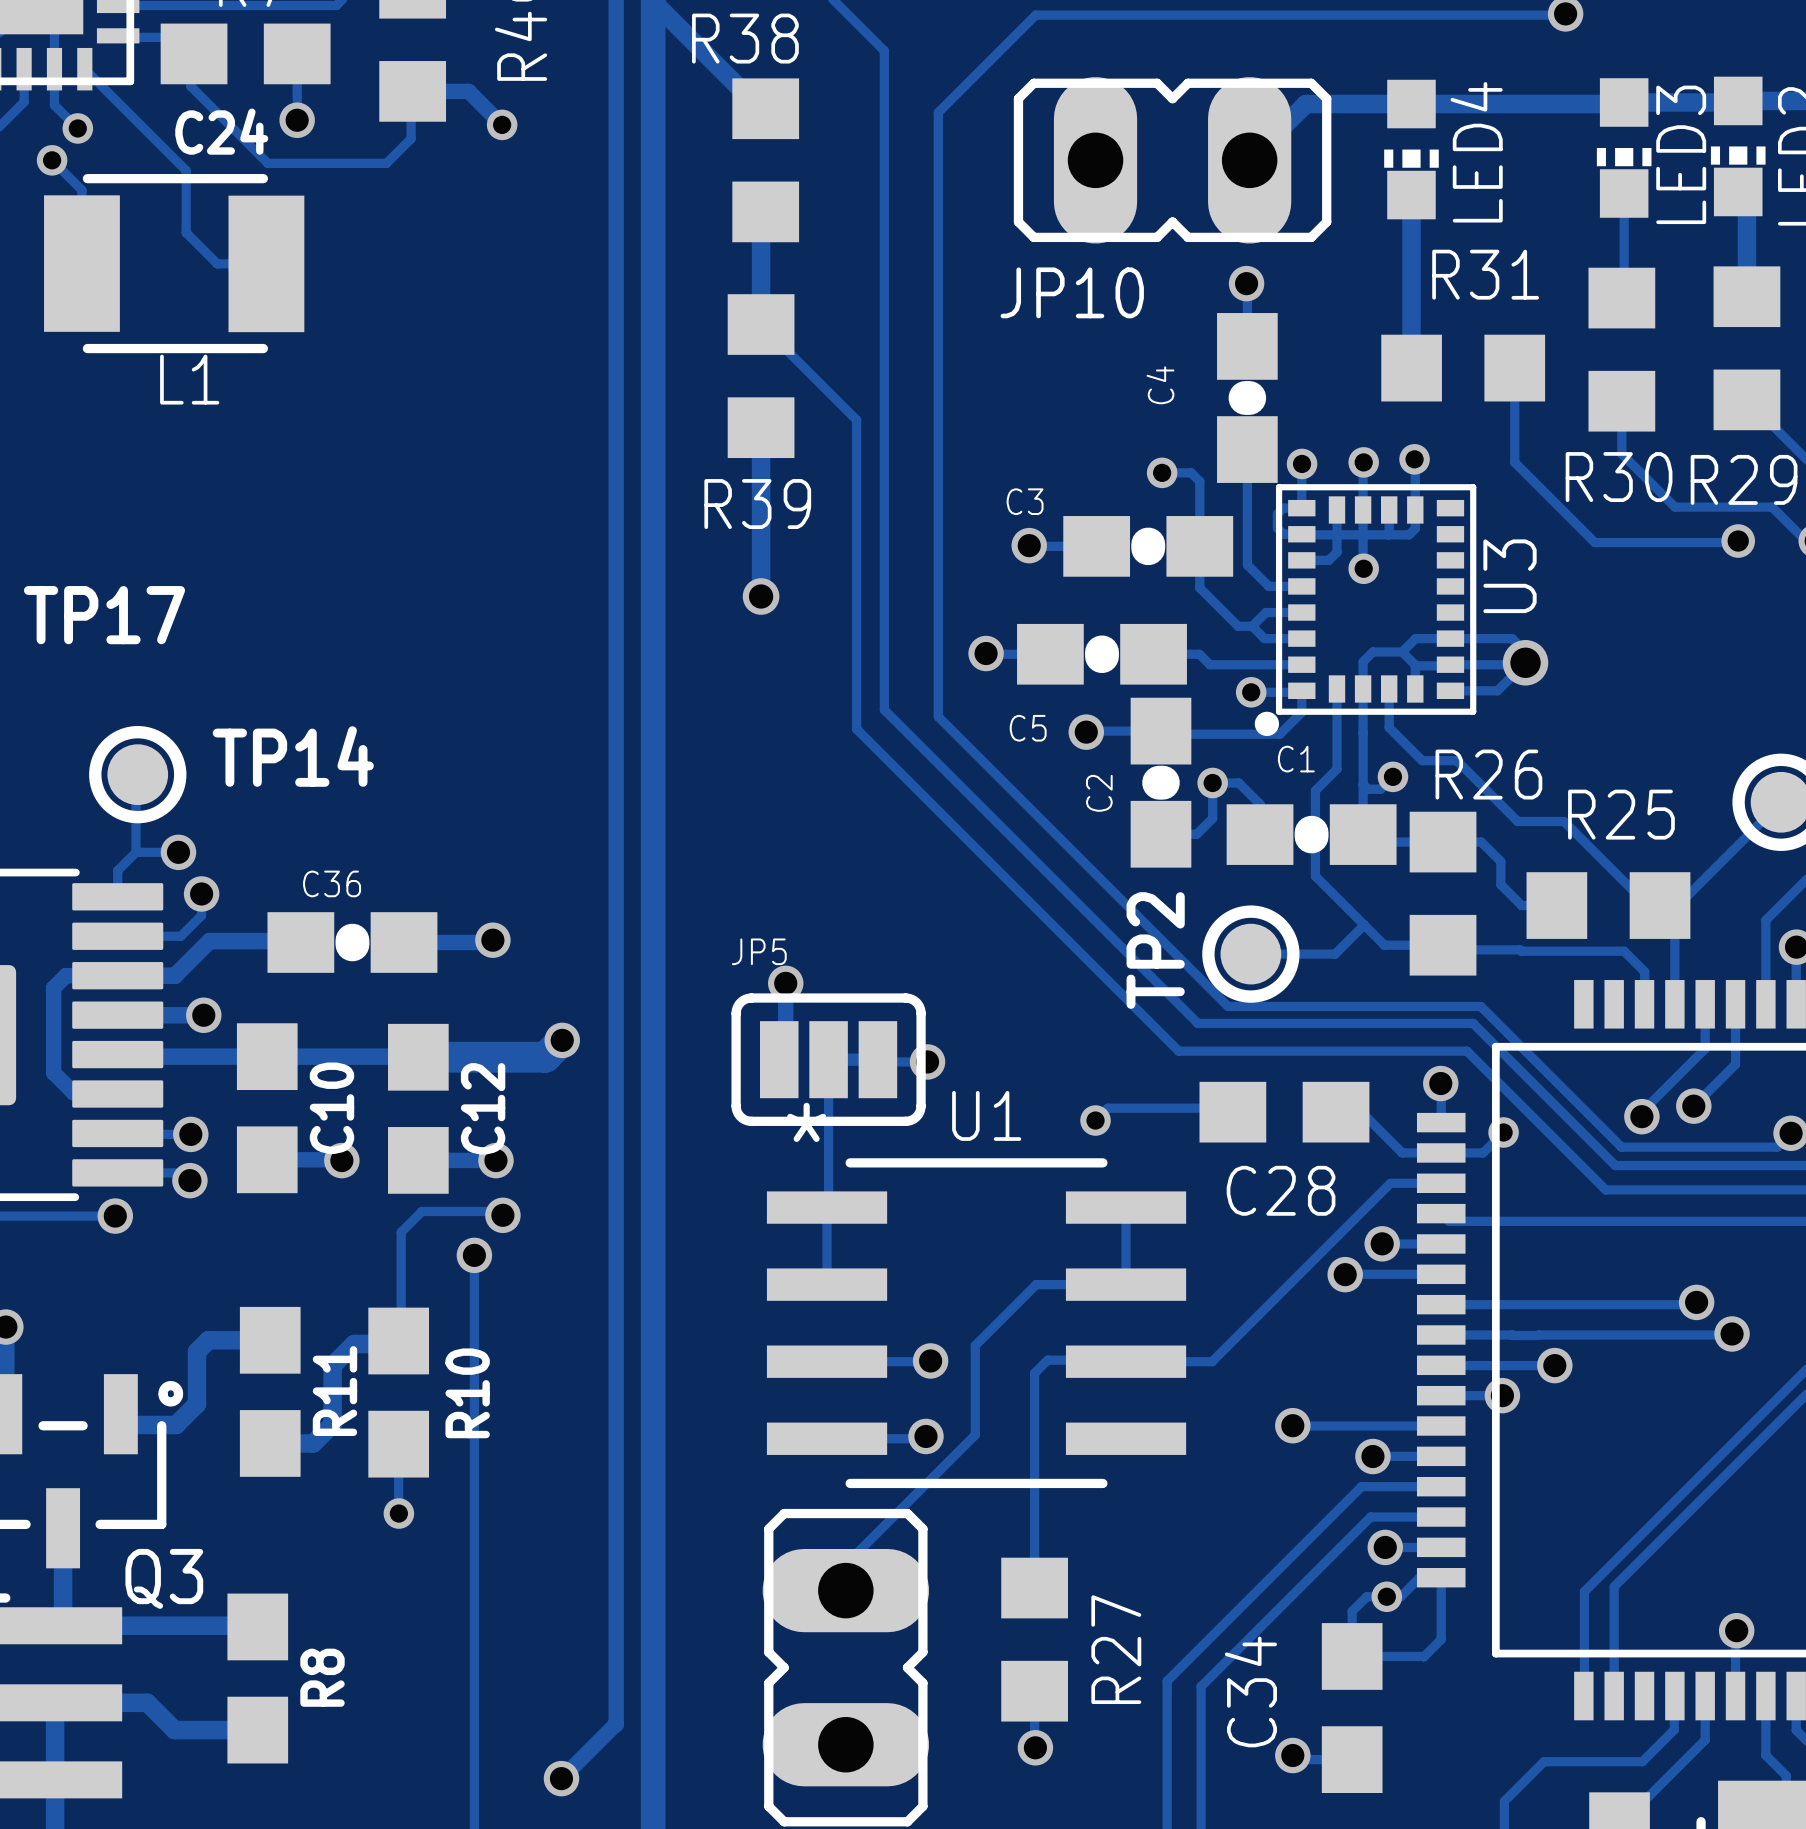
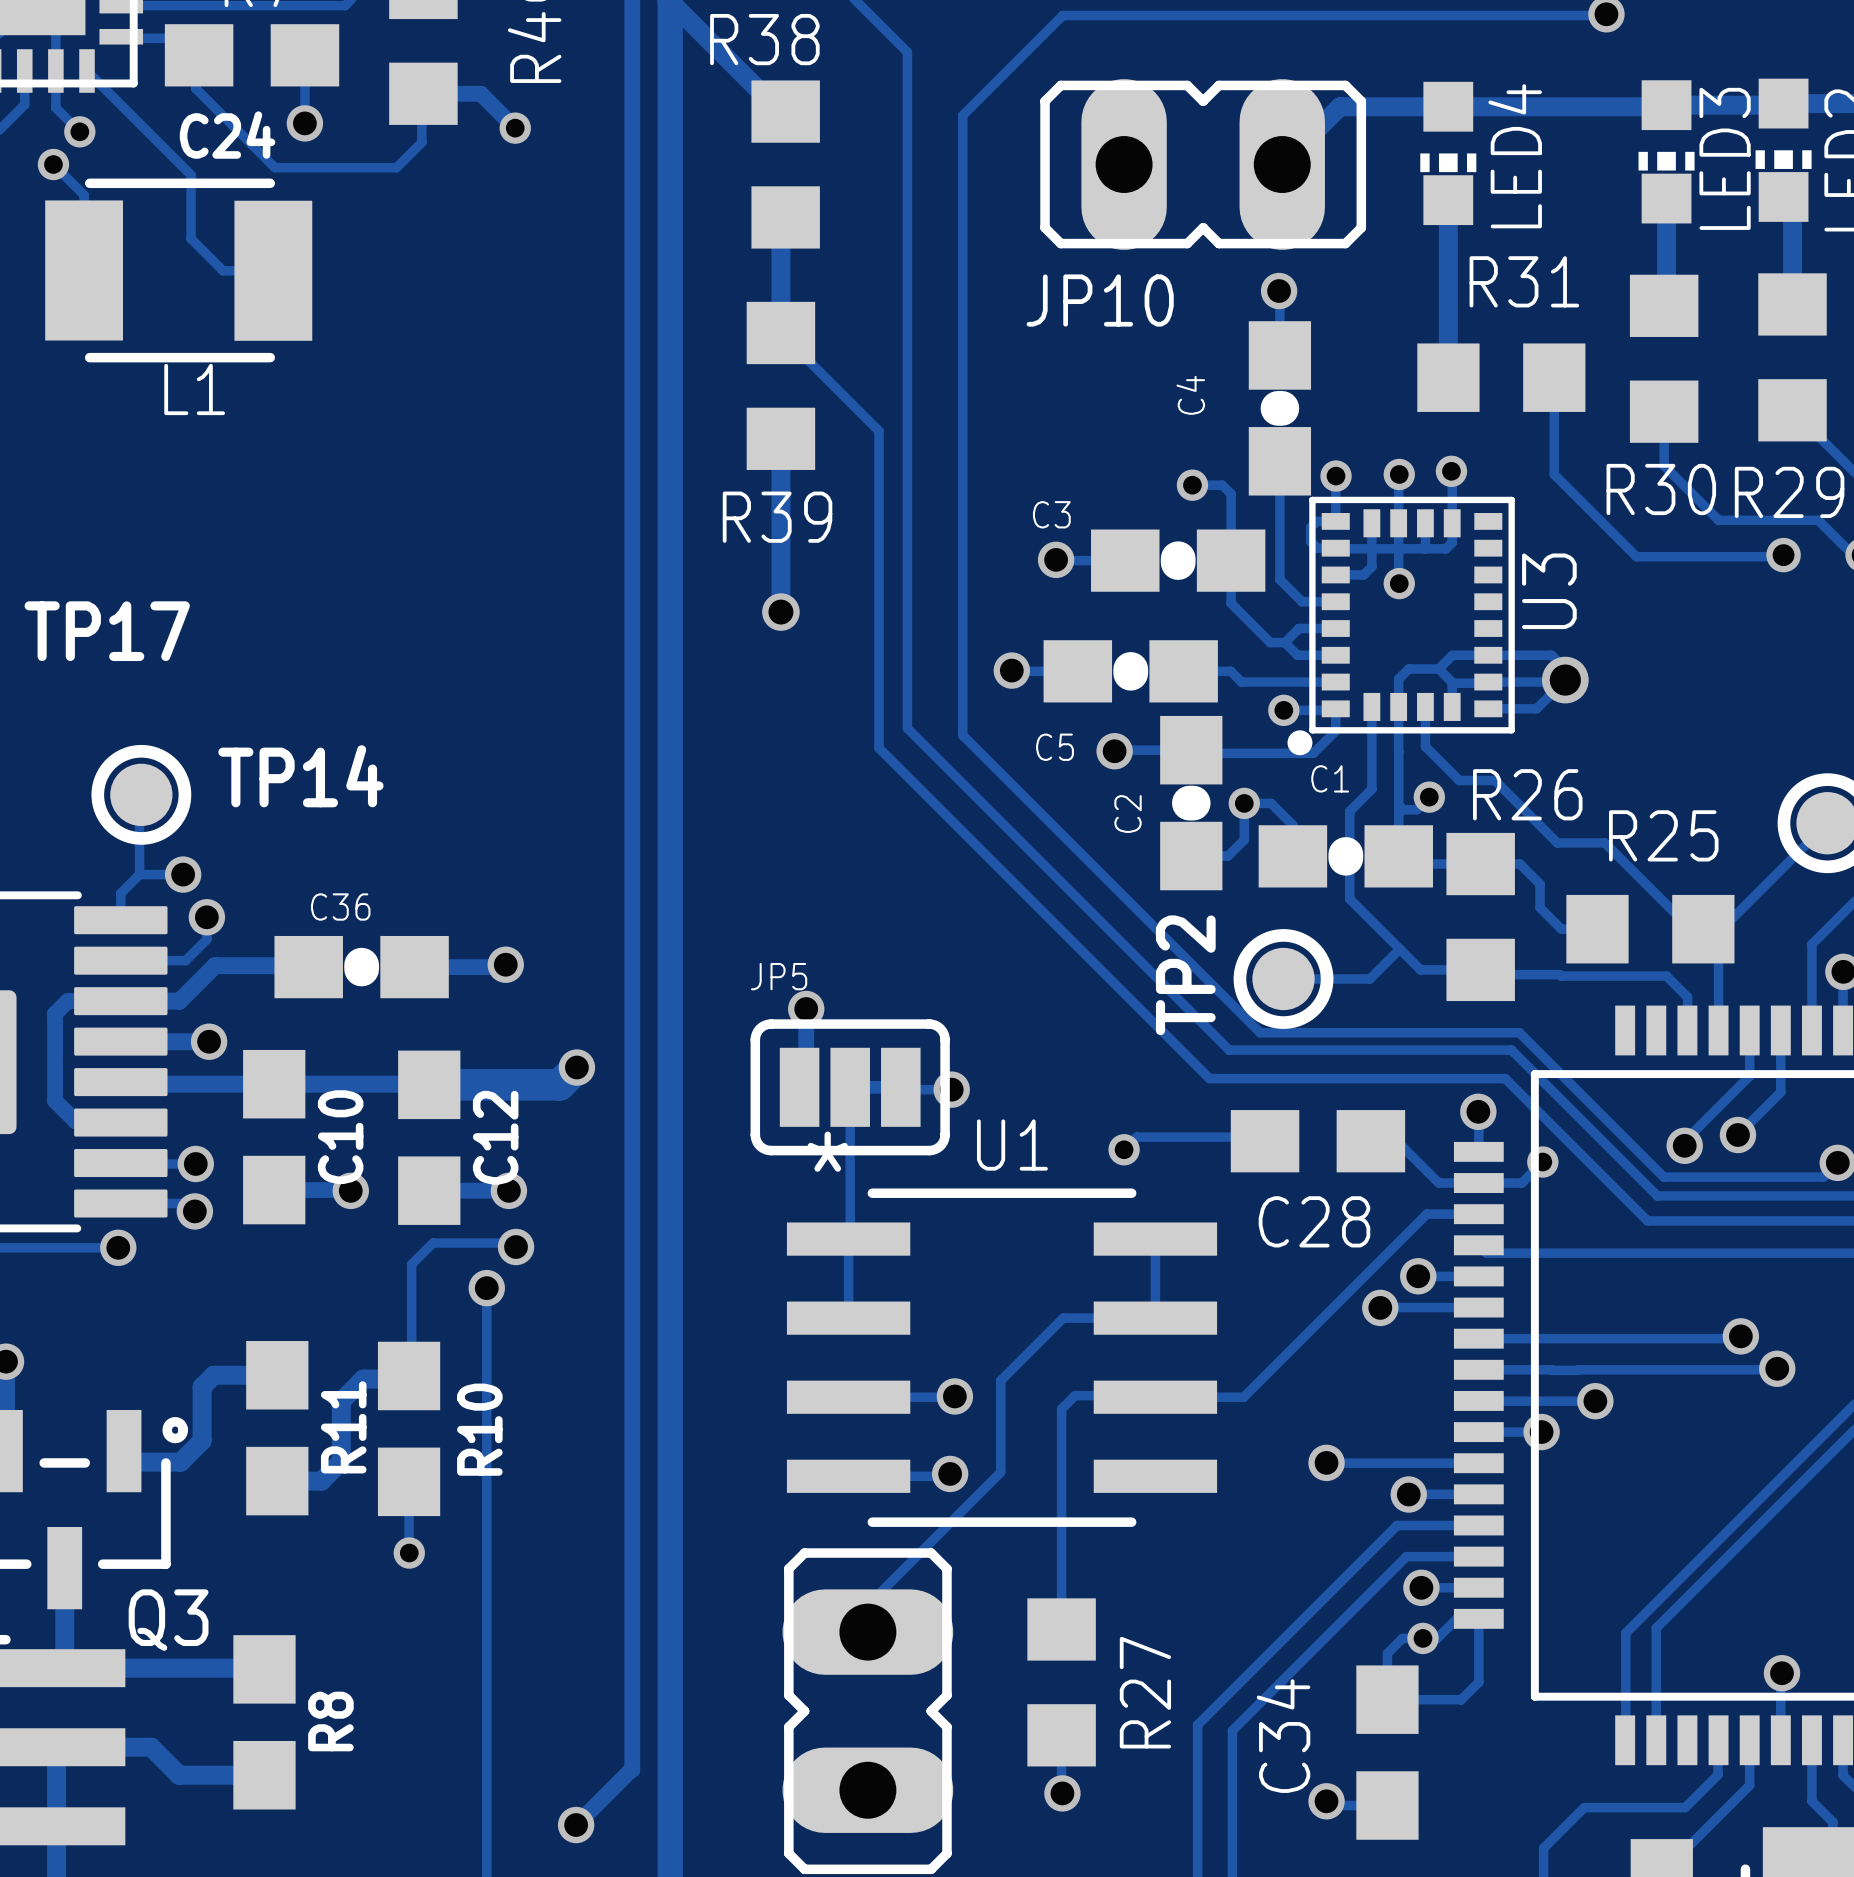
track width: thin (1624, 193) (1624, 295) -> thick (1666, 198) (1666, 303)

